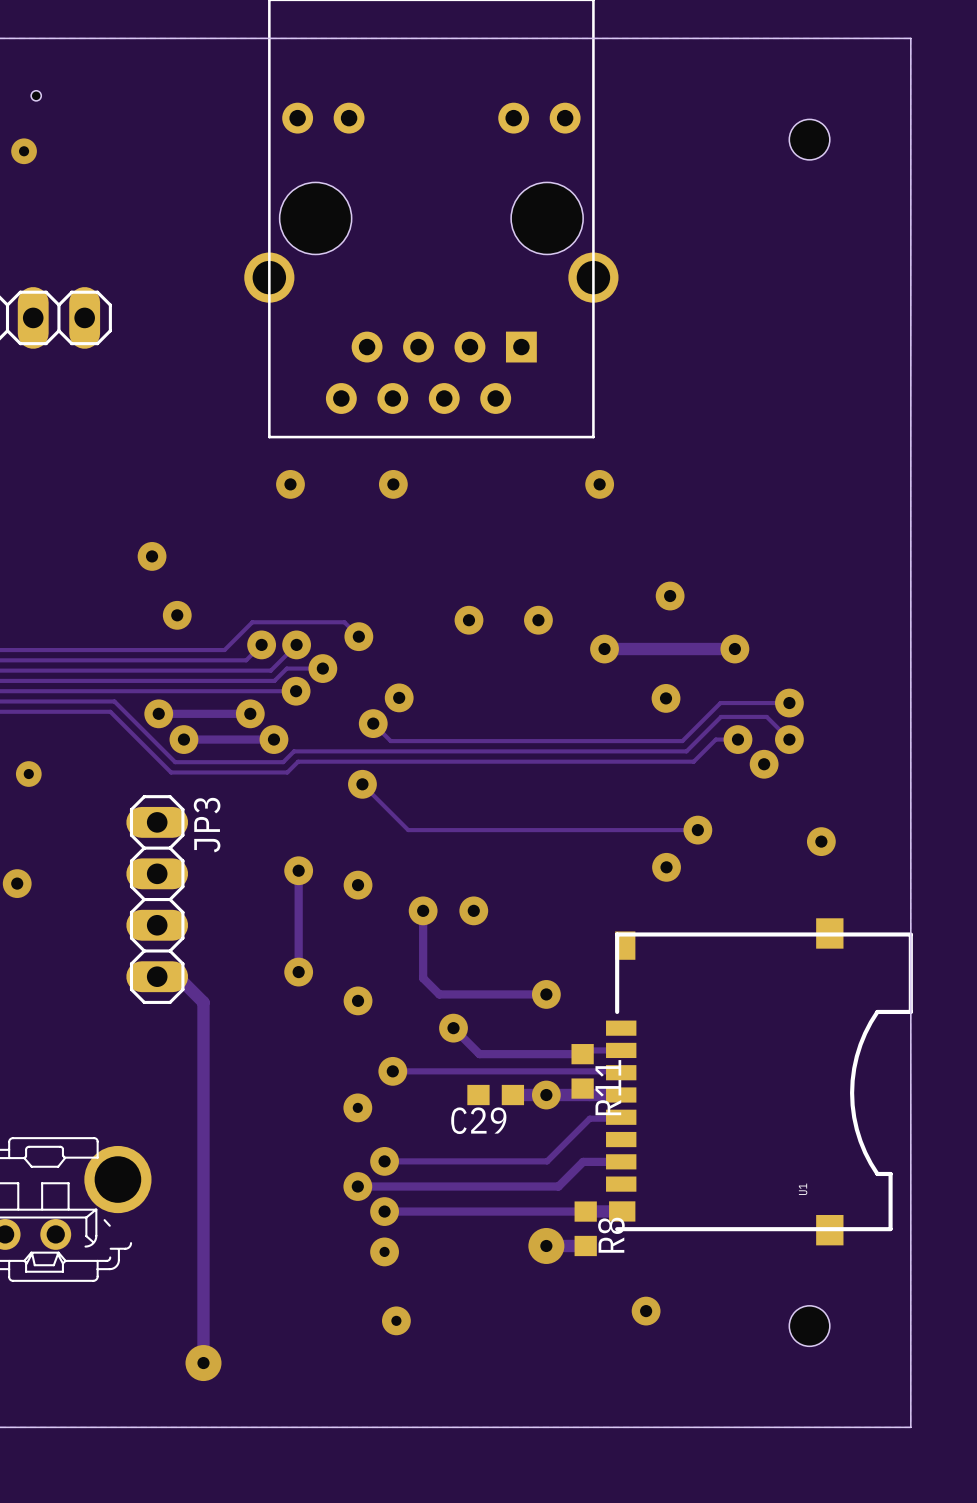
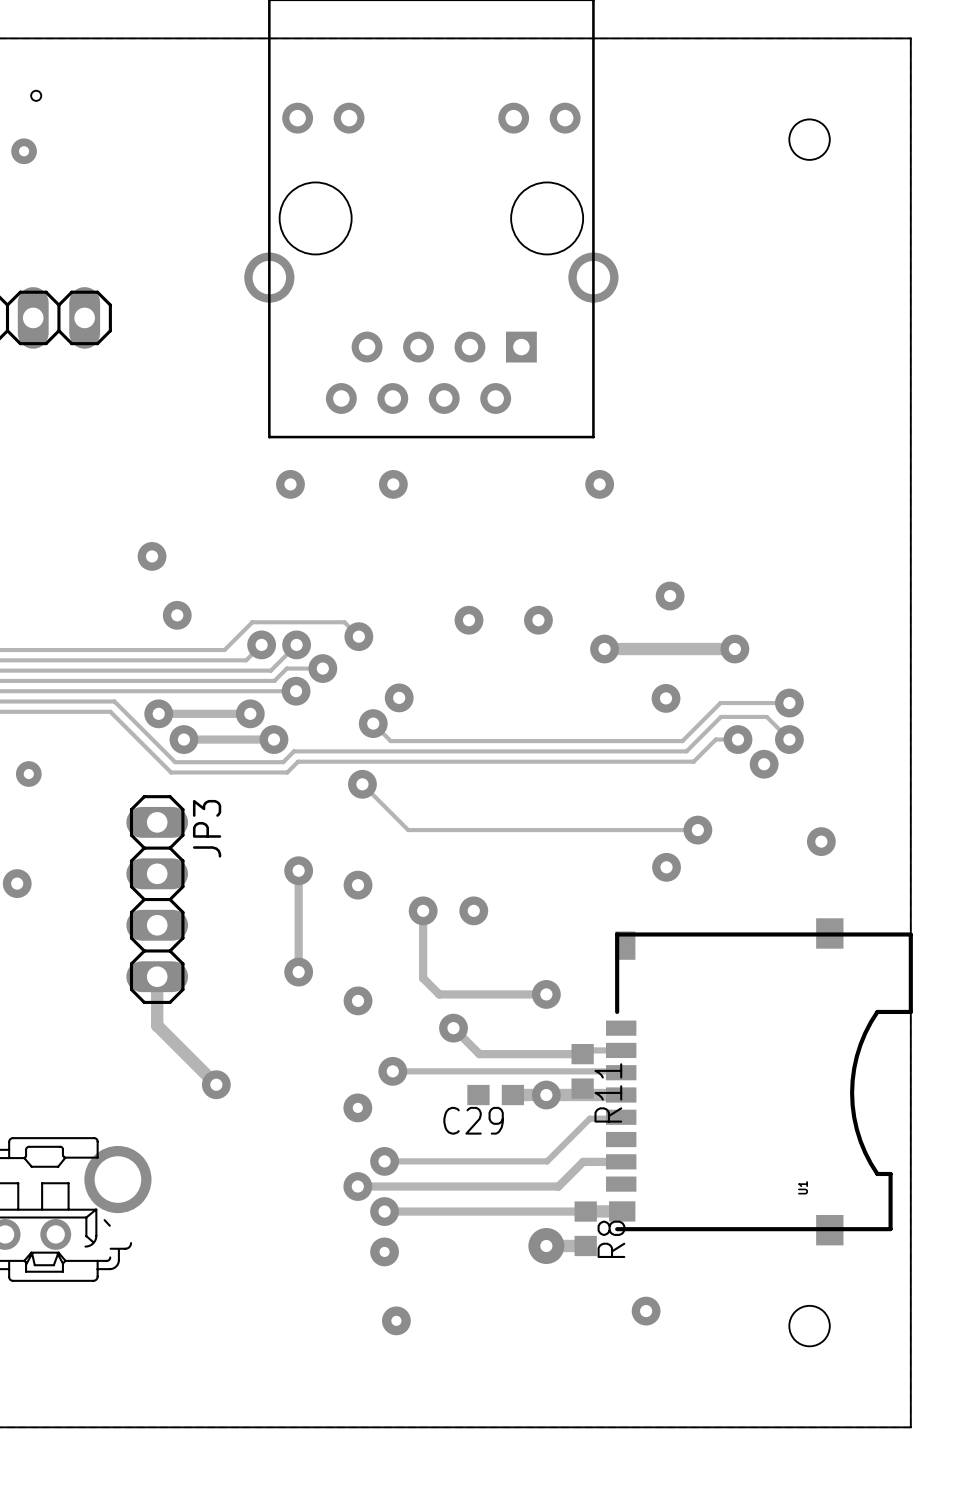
track: (157, 976) (177, 976) (203, 1002) (203, 1363) -> (157, 976) (157, 1025) (216, 1084)
via: none -> (216, 1084)
via: (203, 1363) -> none

